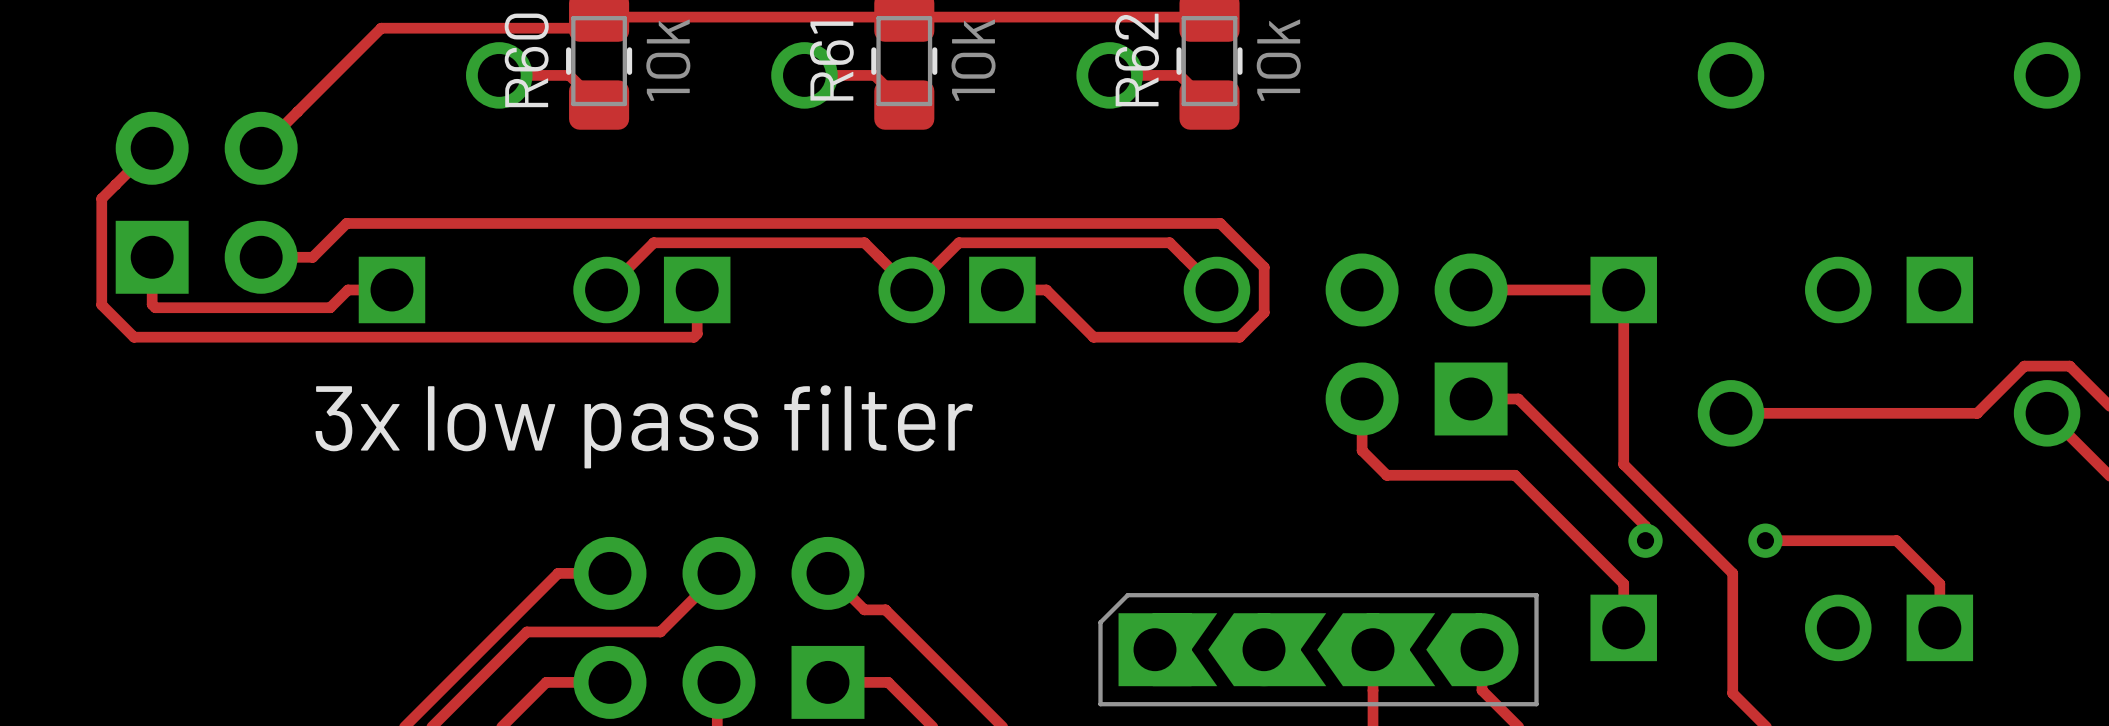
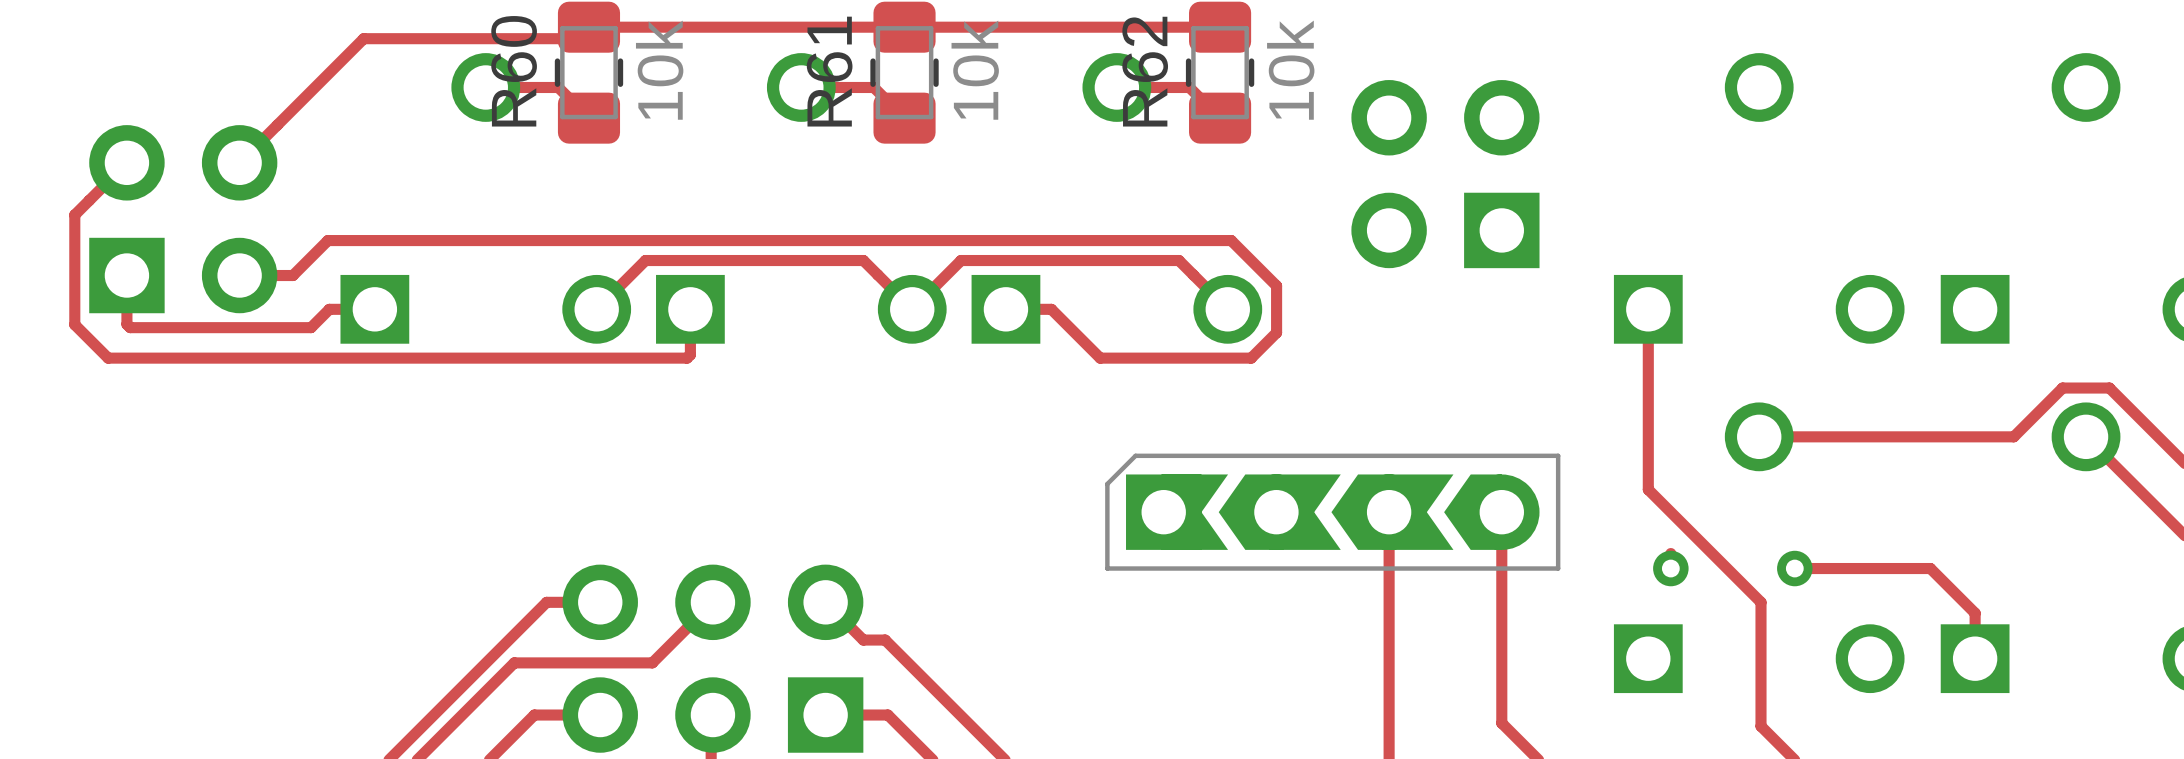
track: (1471, 289) (1623, 289) -> none
part position: (1416, 344) -> (1445, 174)
track: (1362, 398) (1362, 450) (1386, 475) (1515, 475) (1623, 583) (1623, 627) -> none
track: (1471, 398) (1518, 398) (1645, 526) -> none
text: 3x low pass filter (644, 426) -> none
track: none -> (1389, 512) (1389, 681)
track: none -> (1501, 512) (1501, 681)
part position: (1318, 649) -> (1332, 512)

